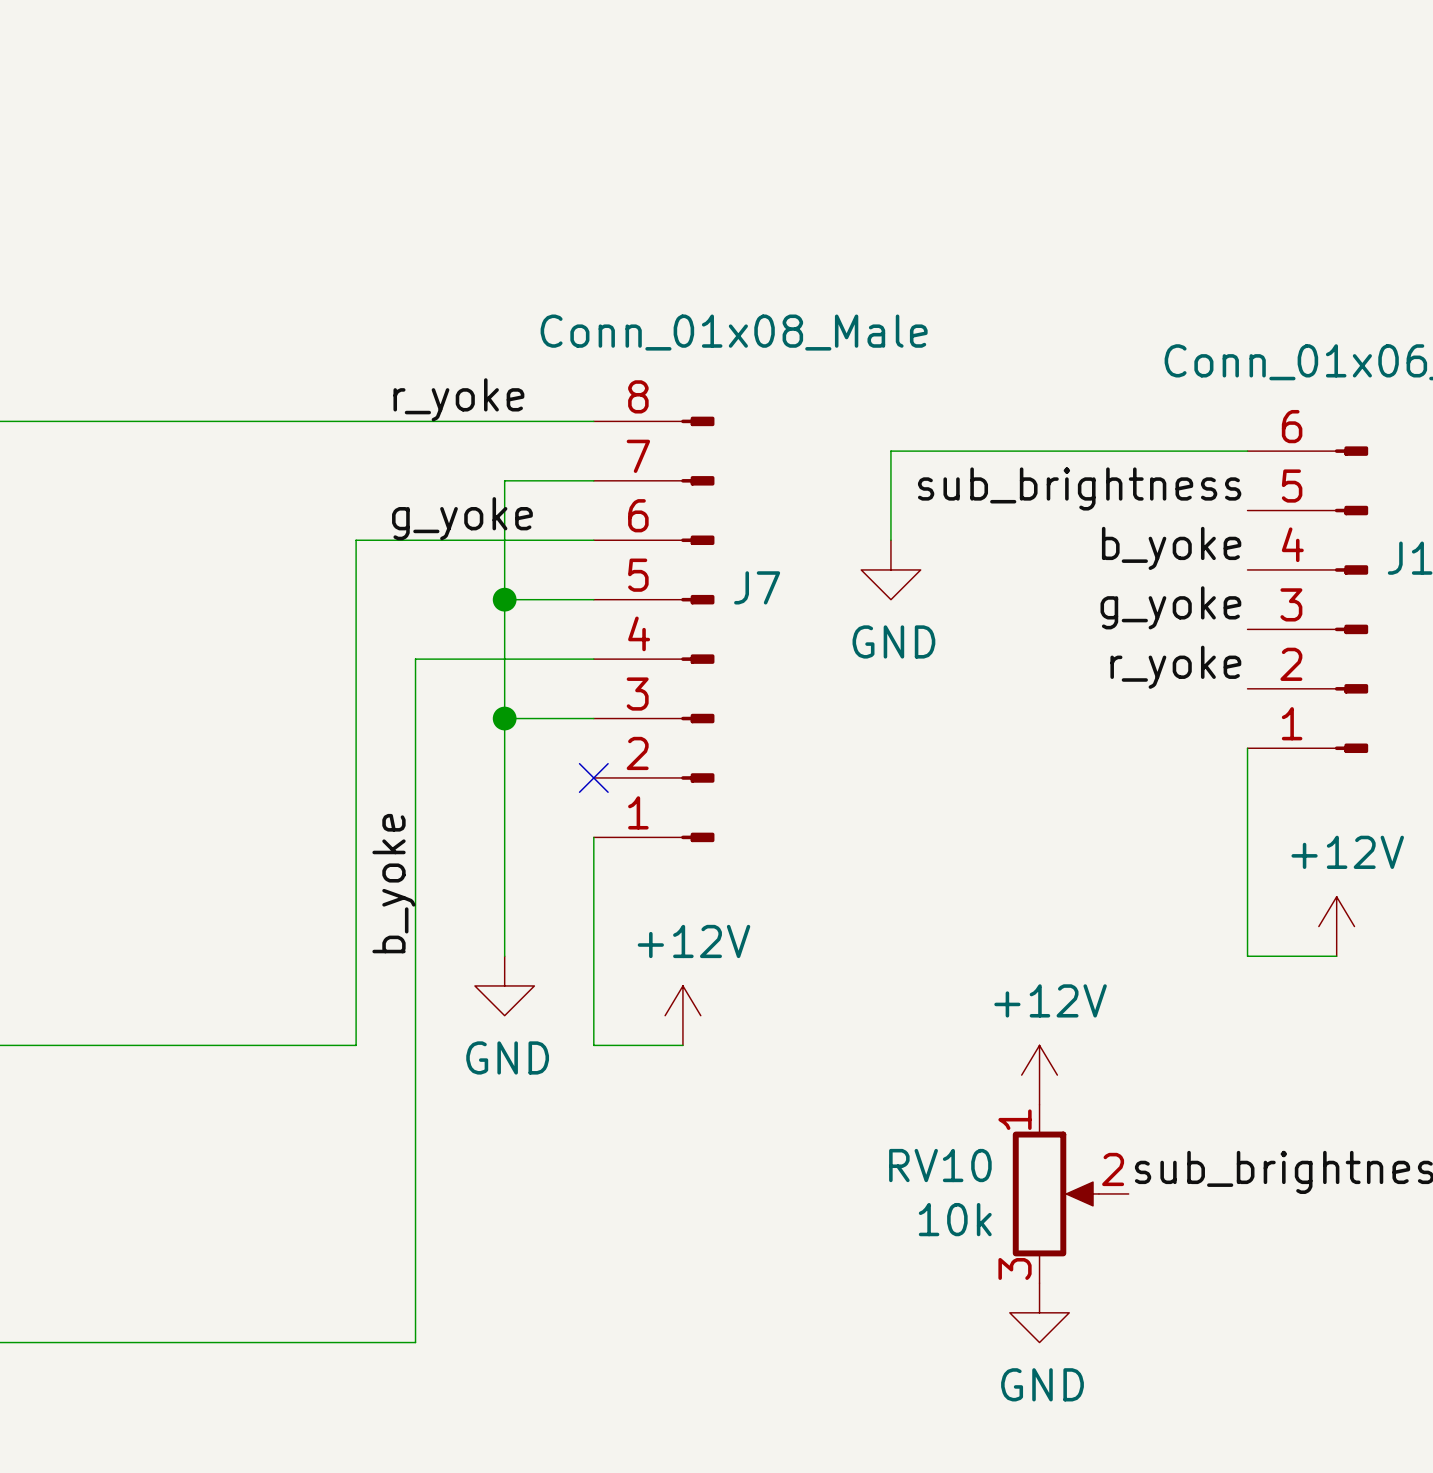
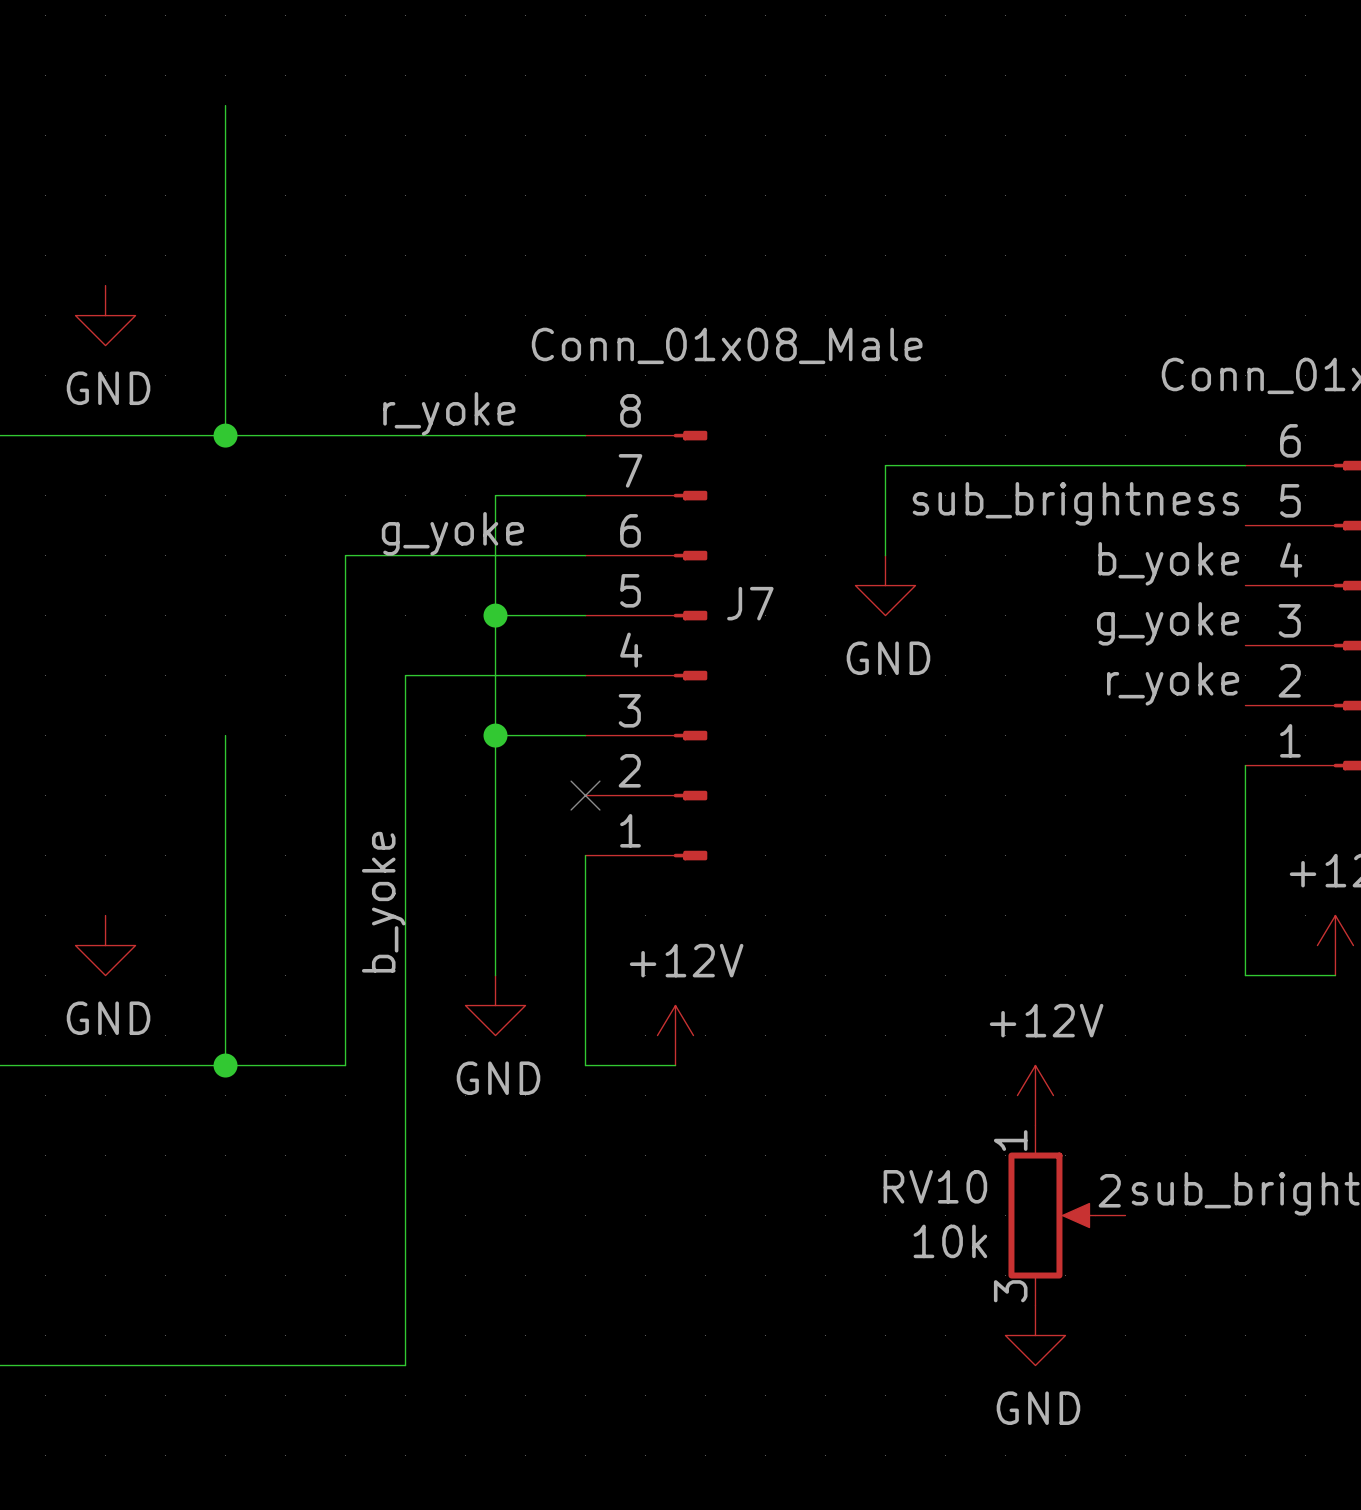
wire: none -> (225, 105) (225, 435)
power symbol: none -> GND (105, 315)
junction: none -> (225, 435)
wire: none -> (225, 735) (225, 1065)
power symbol: none -> GND (105, 945)
junction: none -> (225, 1065)

